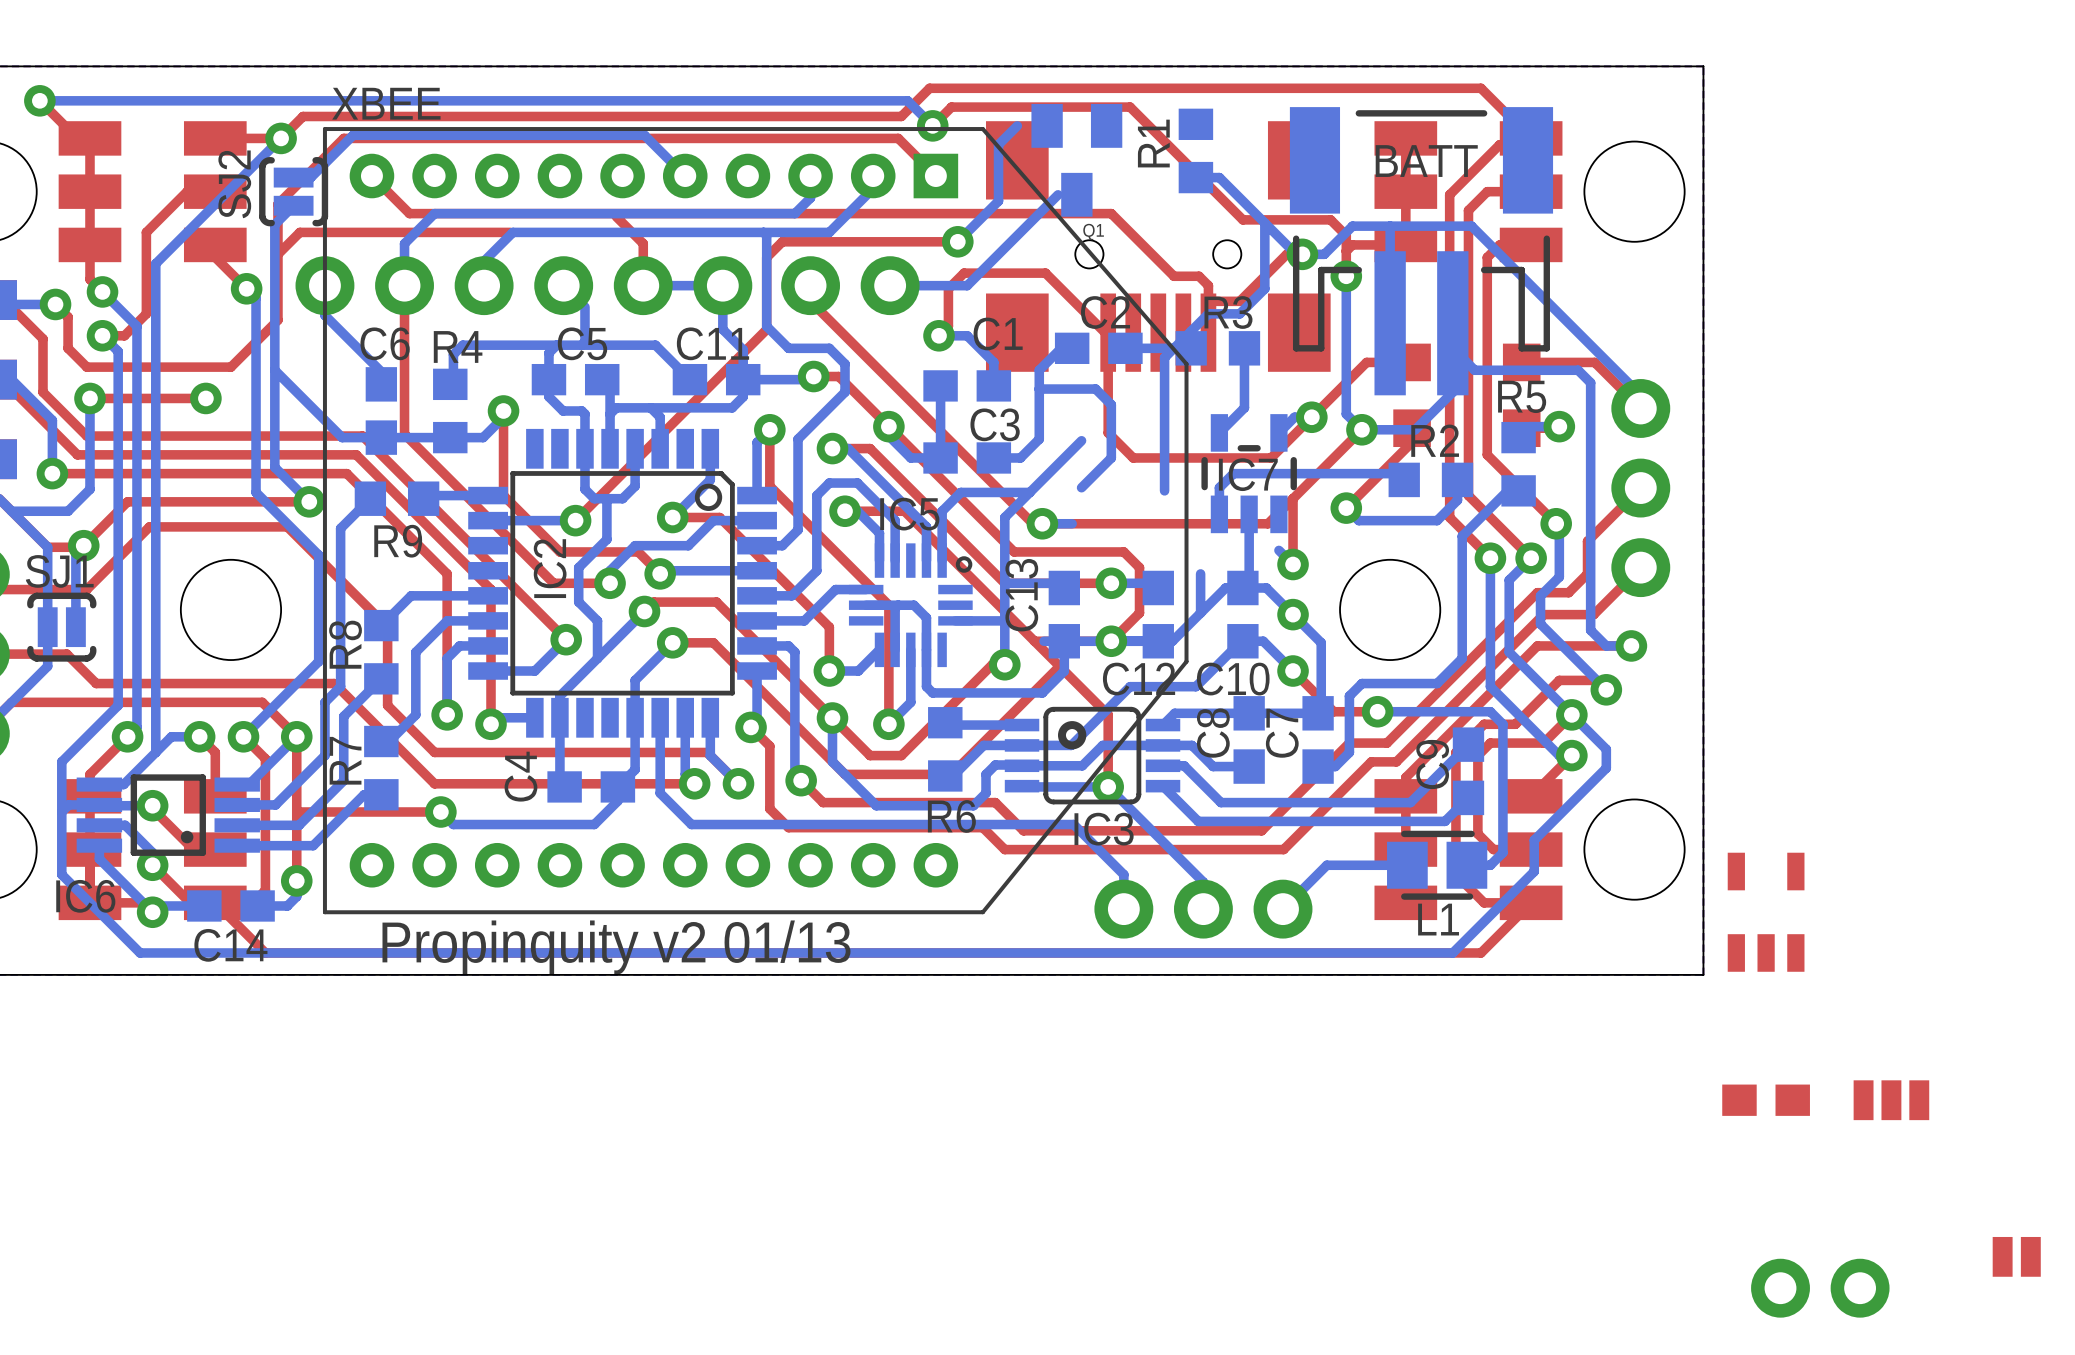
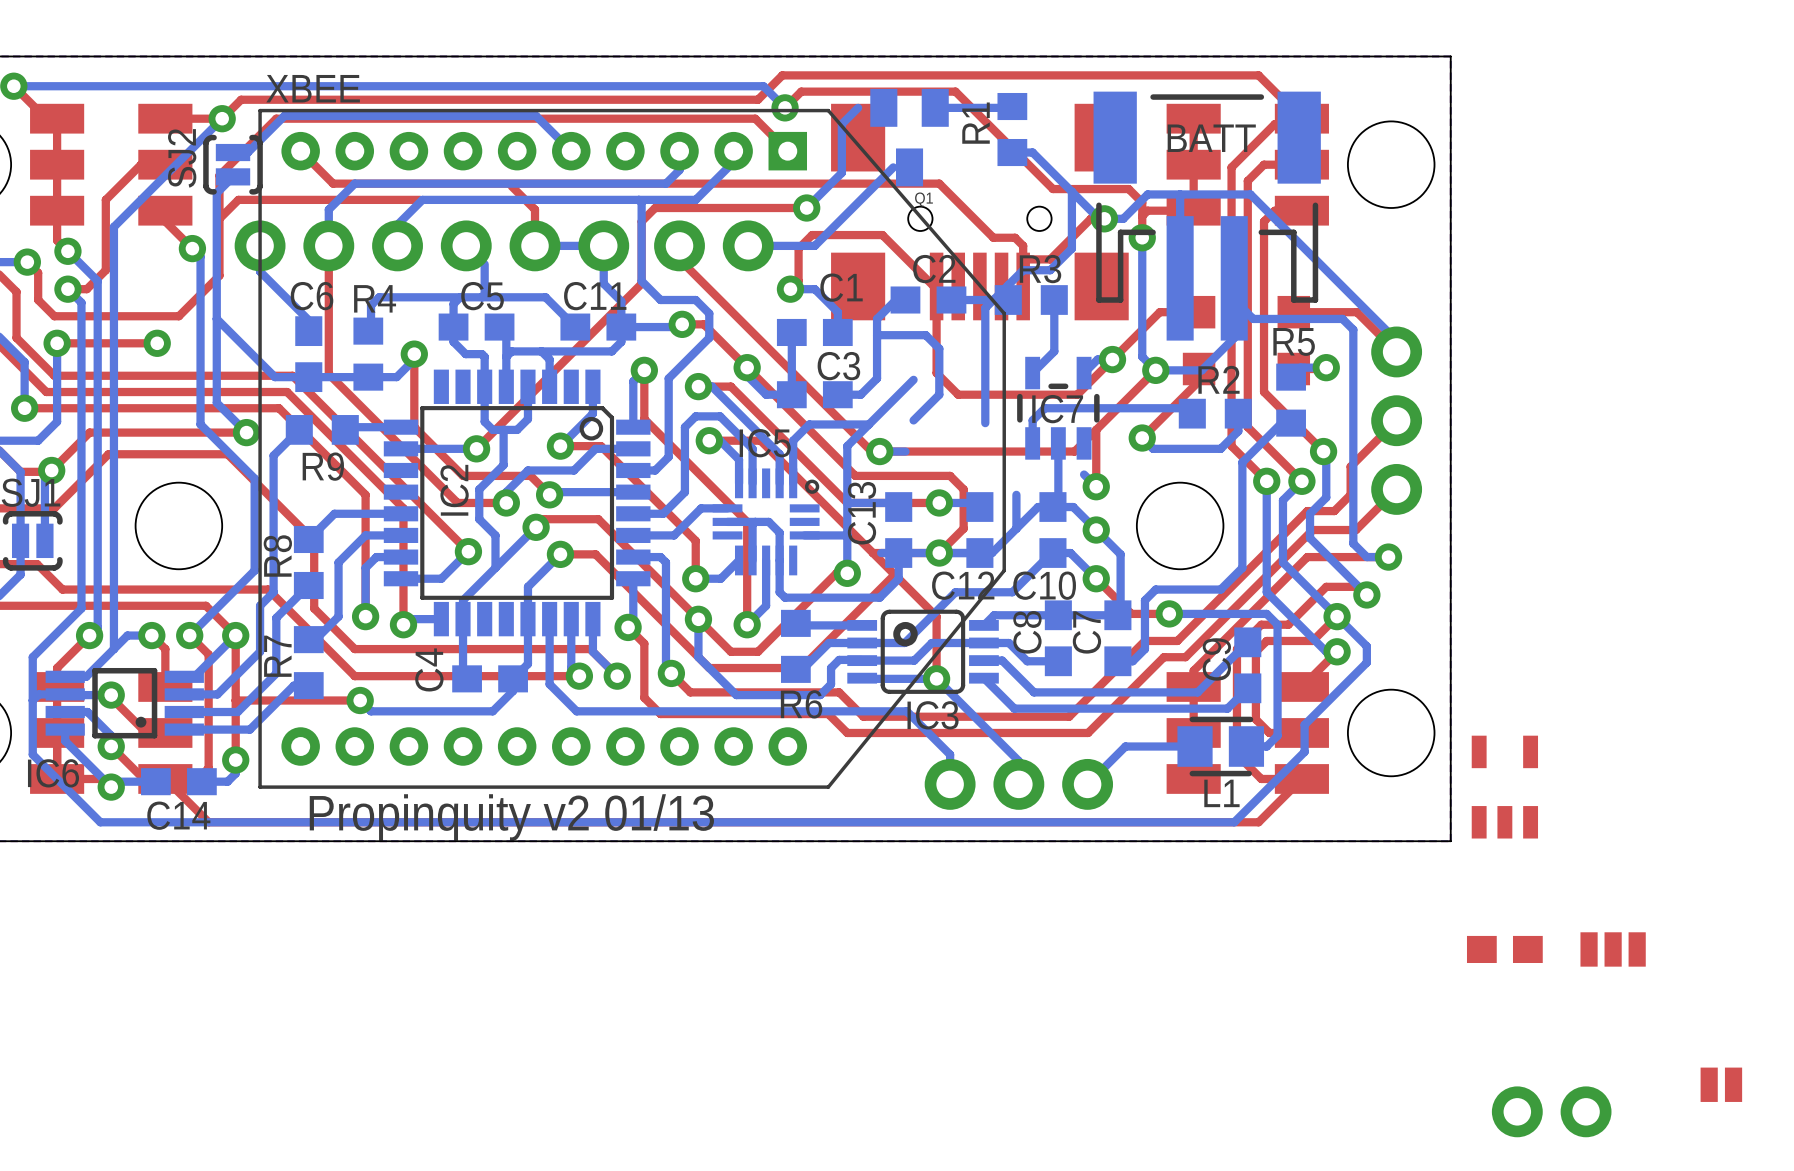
bottom track: none -> (1011, 107) (935, 107)

